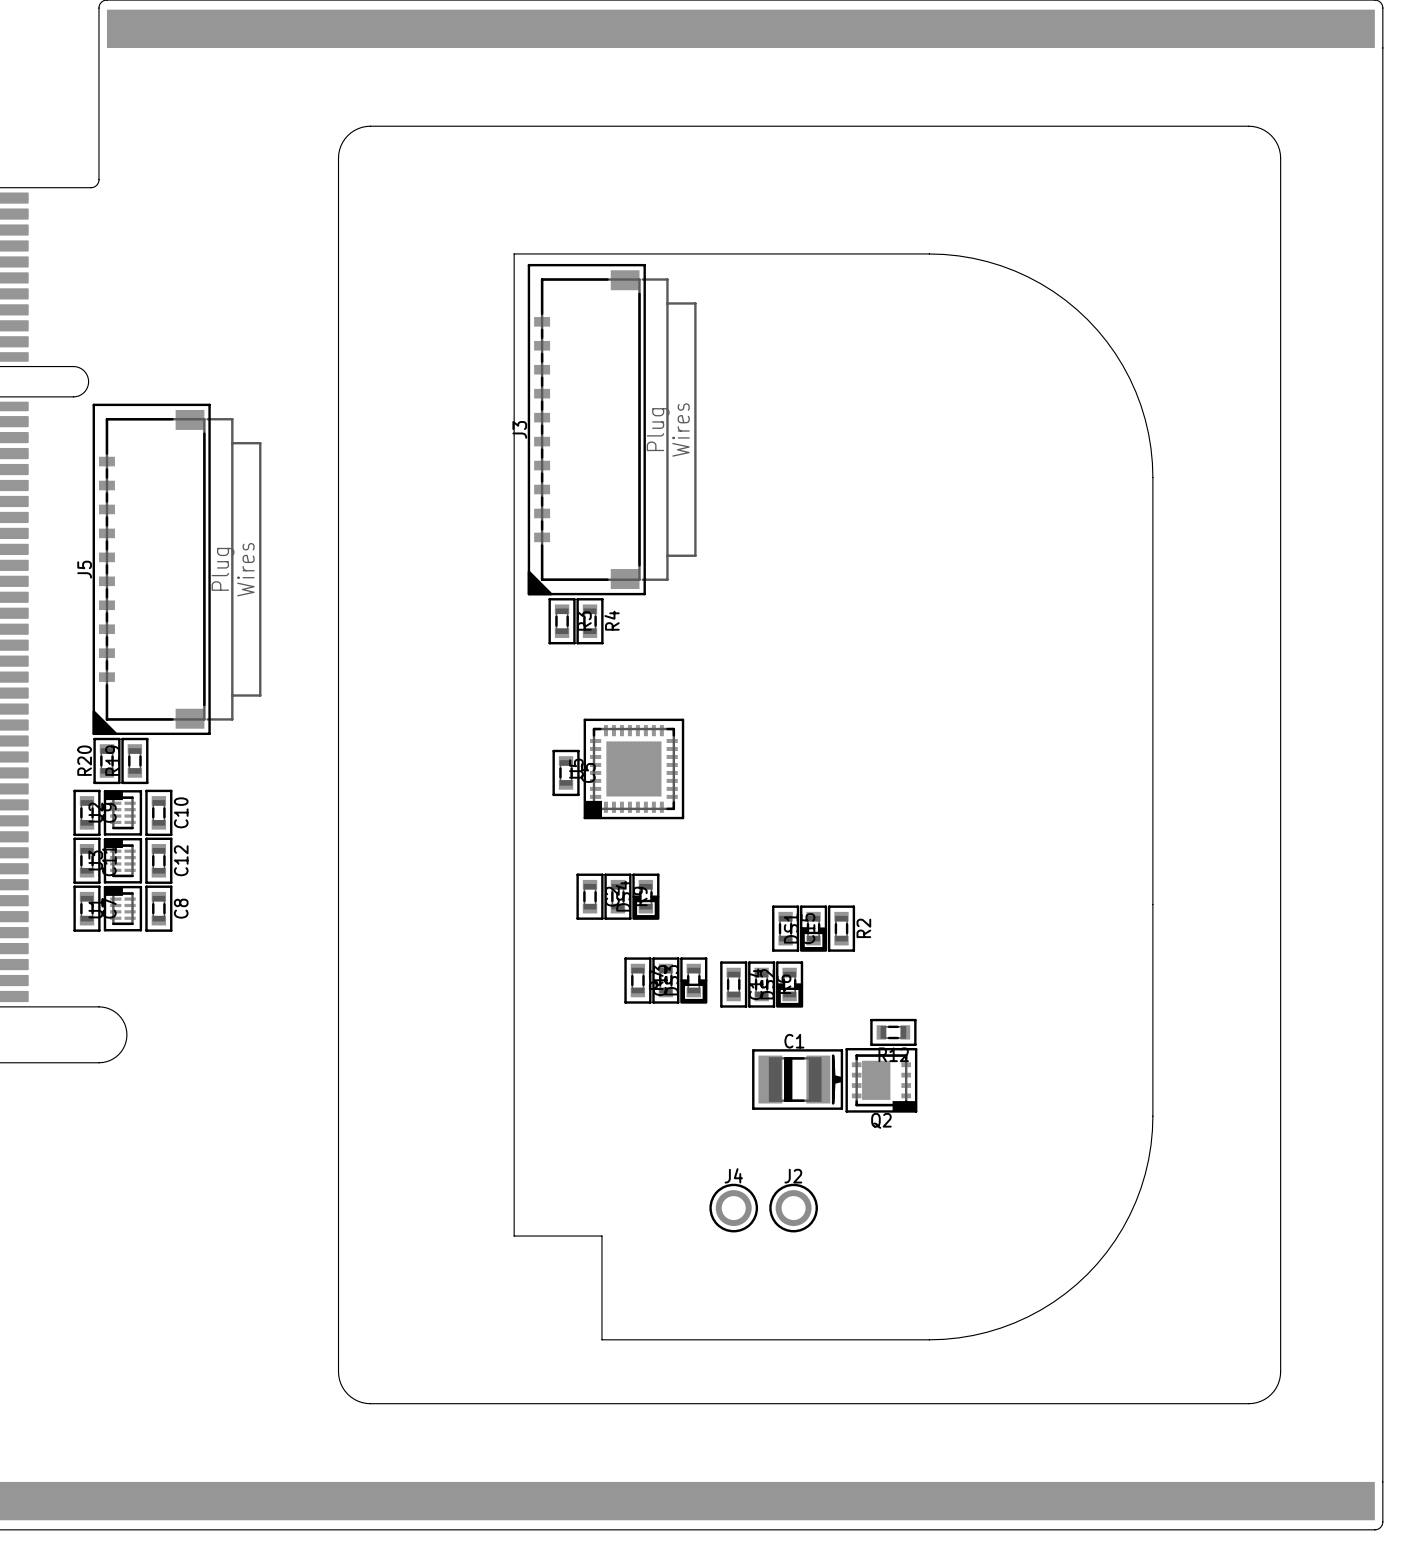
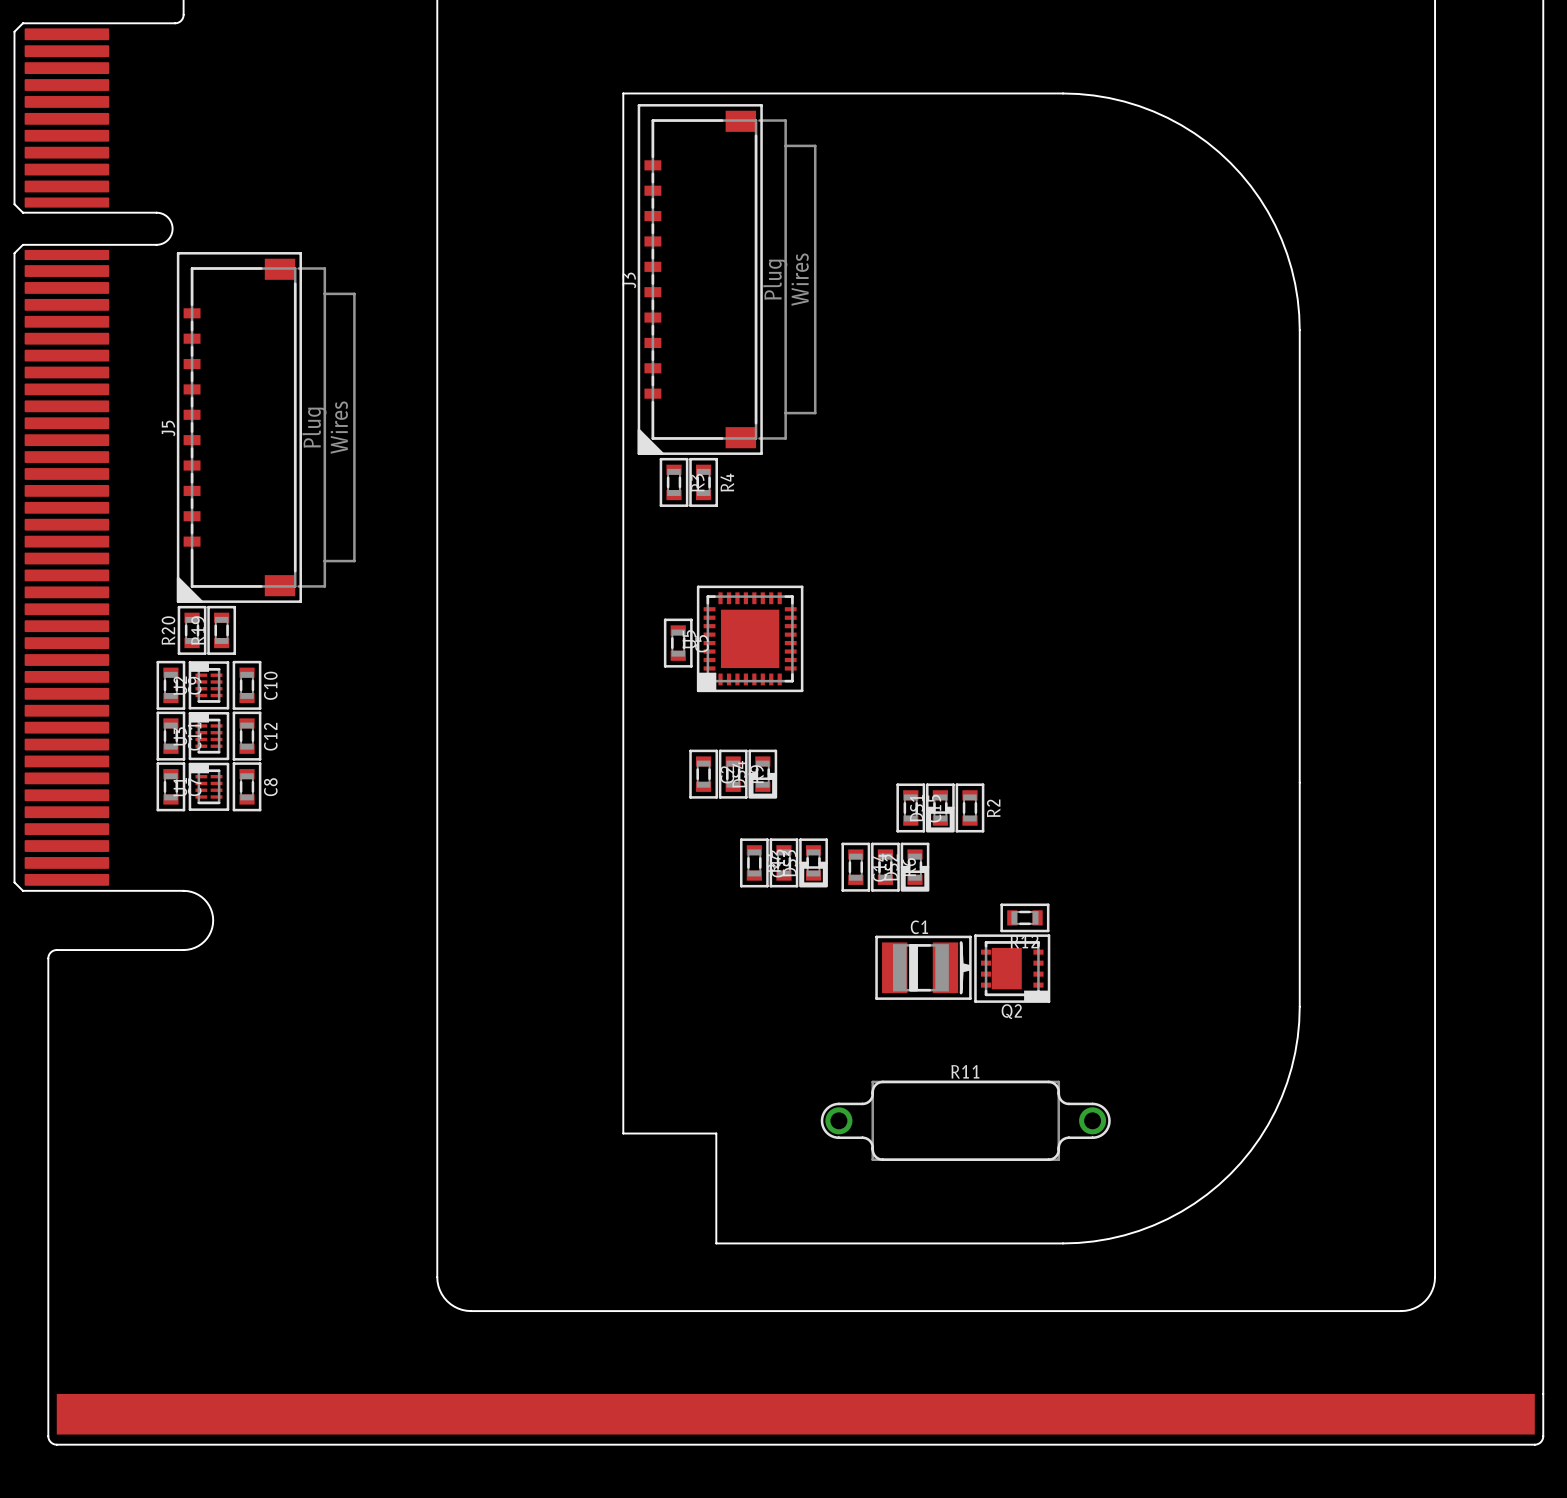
J4: (733, 1208) -> none
J2: (793, 1208) -> none
R11: none -> (965, 1120)

